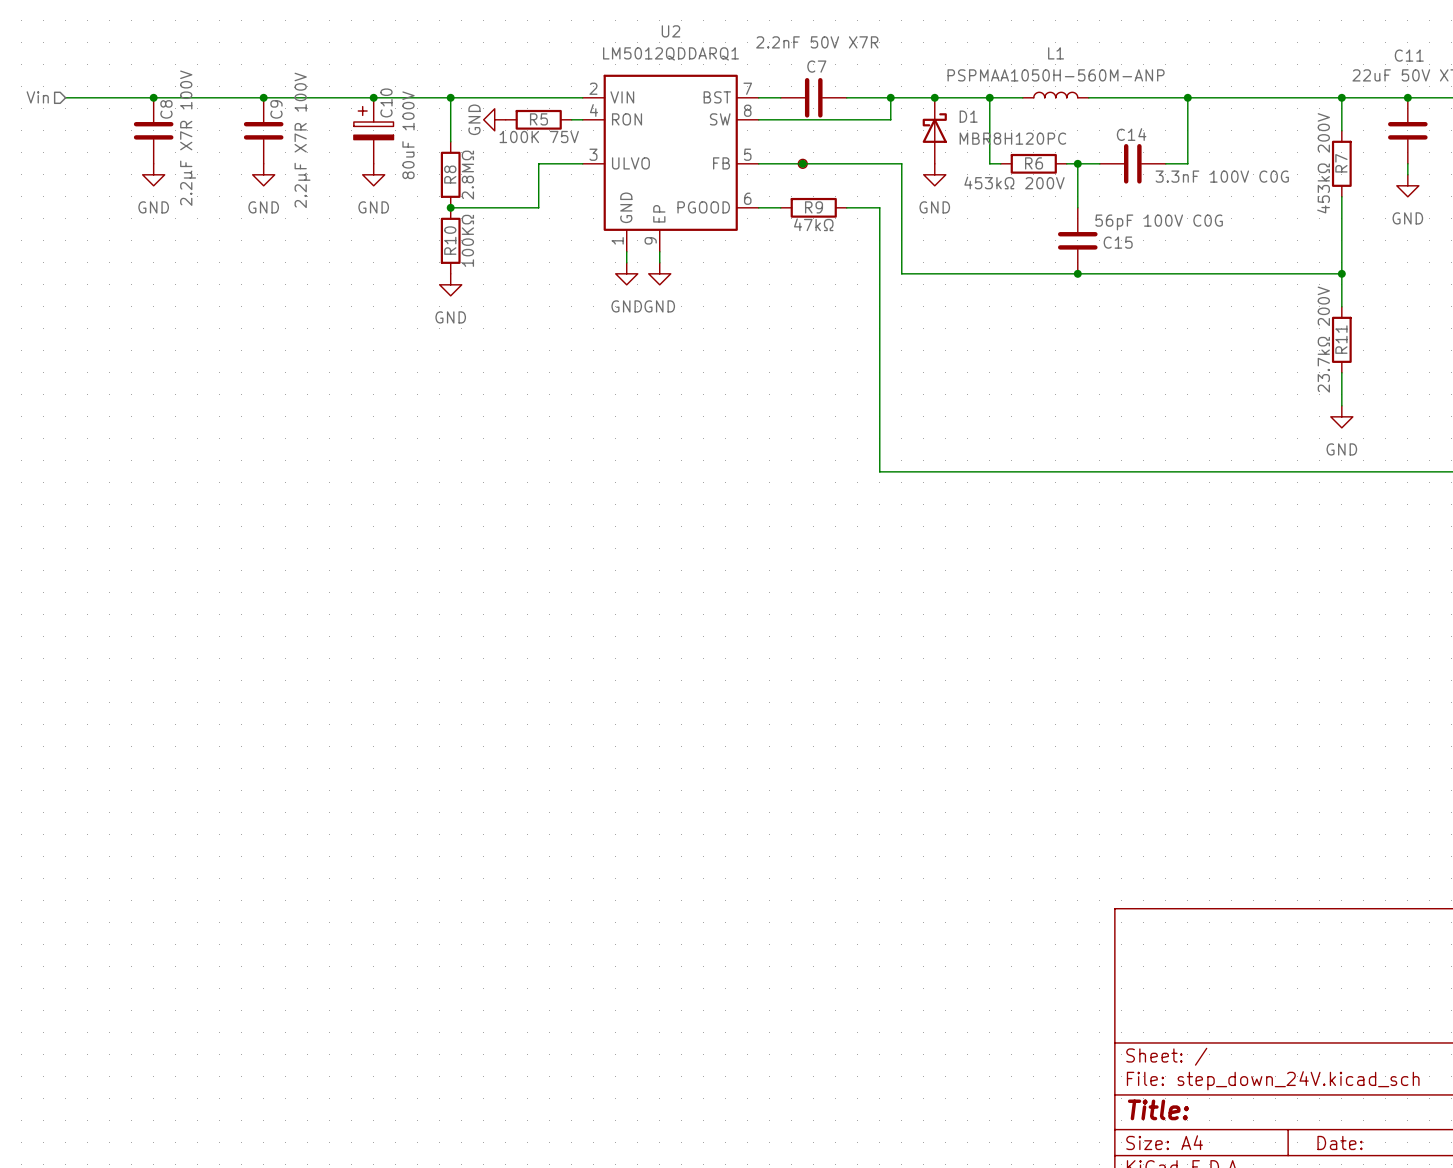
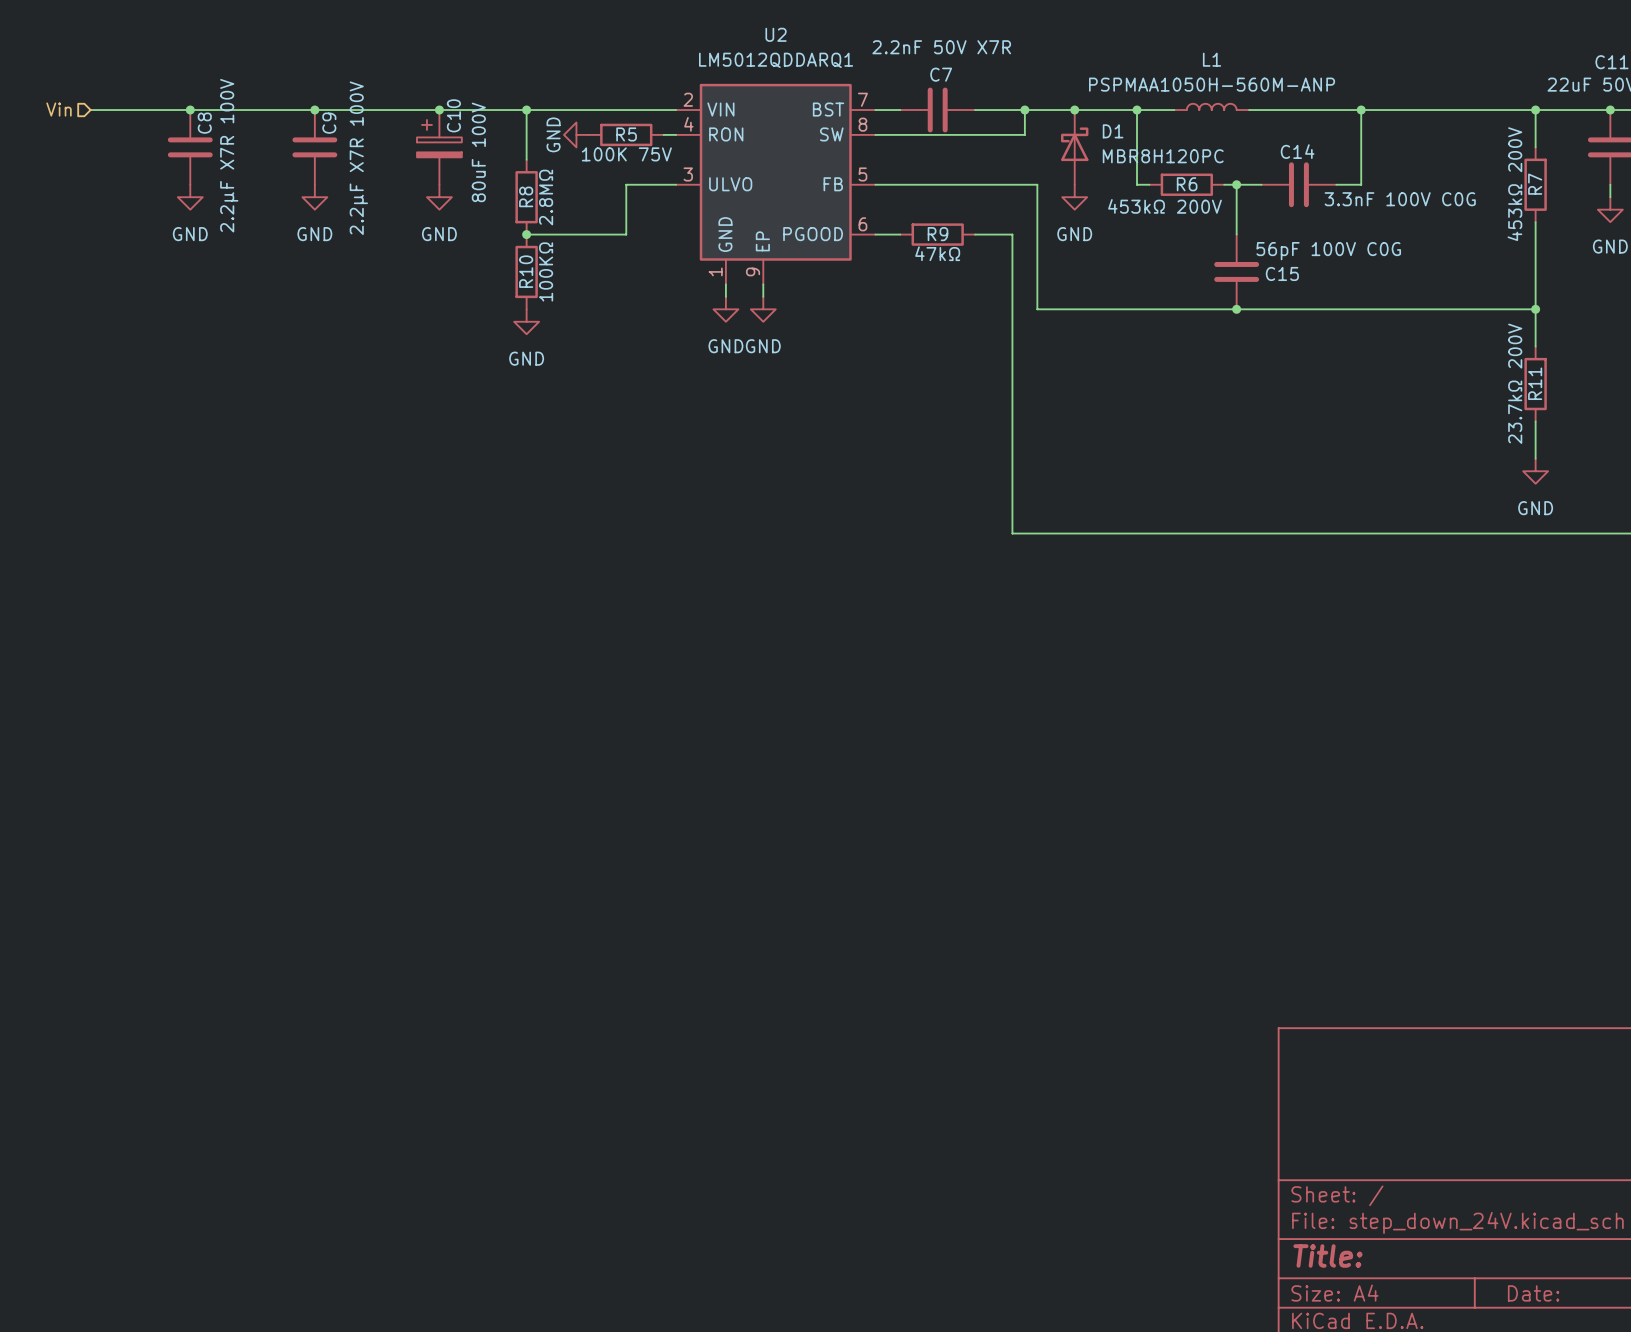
junction: (802, 163) -> none
part: (802, 163) -> none

